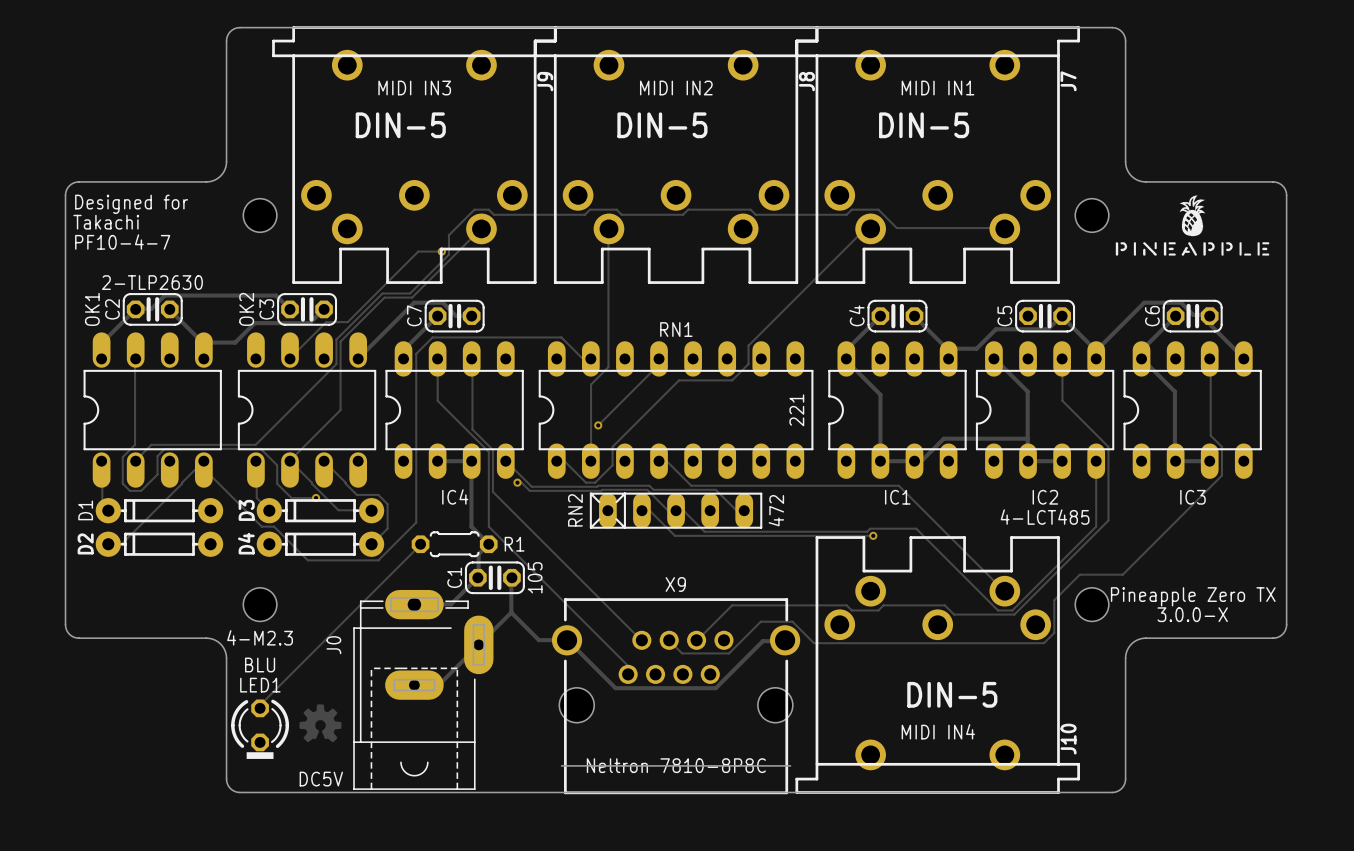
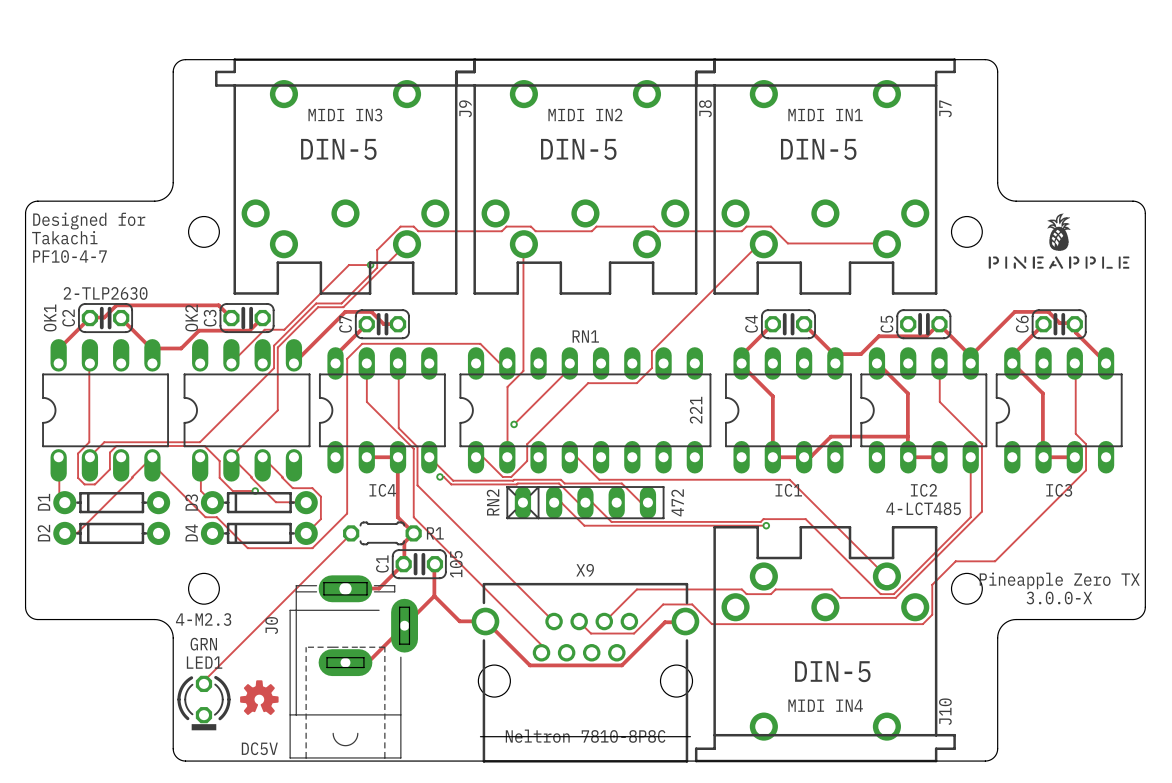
text: BLU (260, 665) -> GRN (203, 644)

